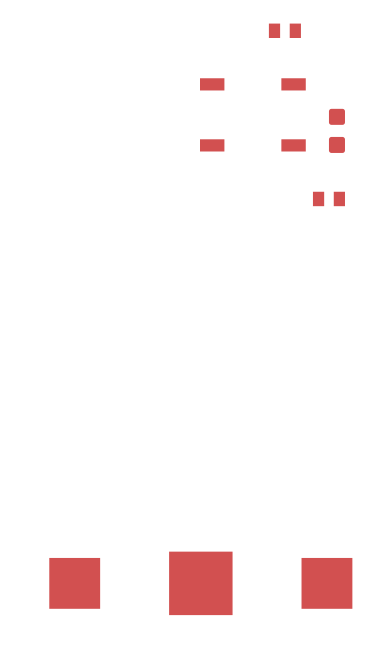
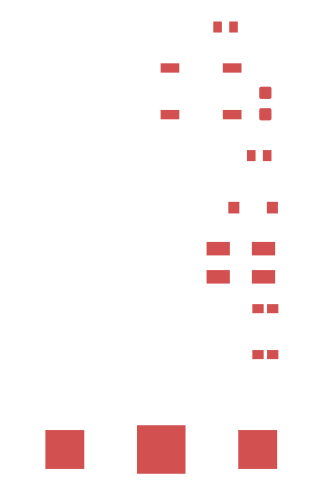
part: none -> (253, 207)
part: none -> (240, 262)
part: none -> (265, 308)
part: none -> (265, 354)

